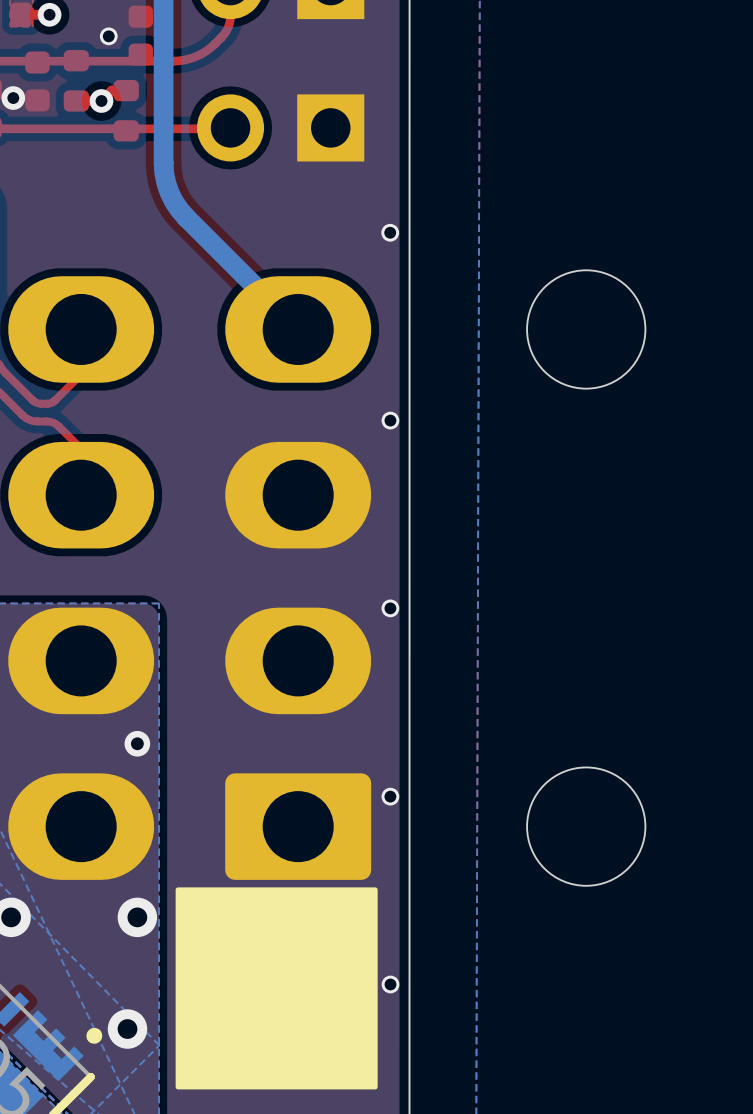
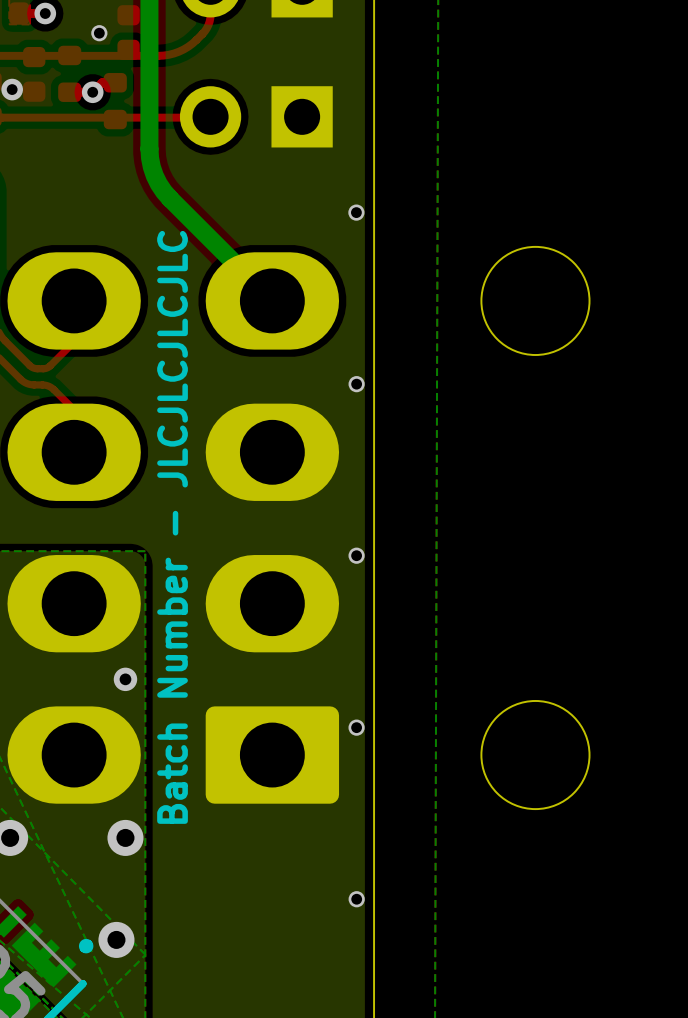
text: none -> Batch Number - JLCJLCJLCJLC (172, 527)
drawing: [175, 887, 378, 1090] -> none

